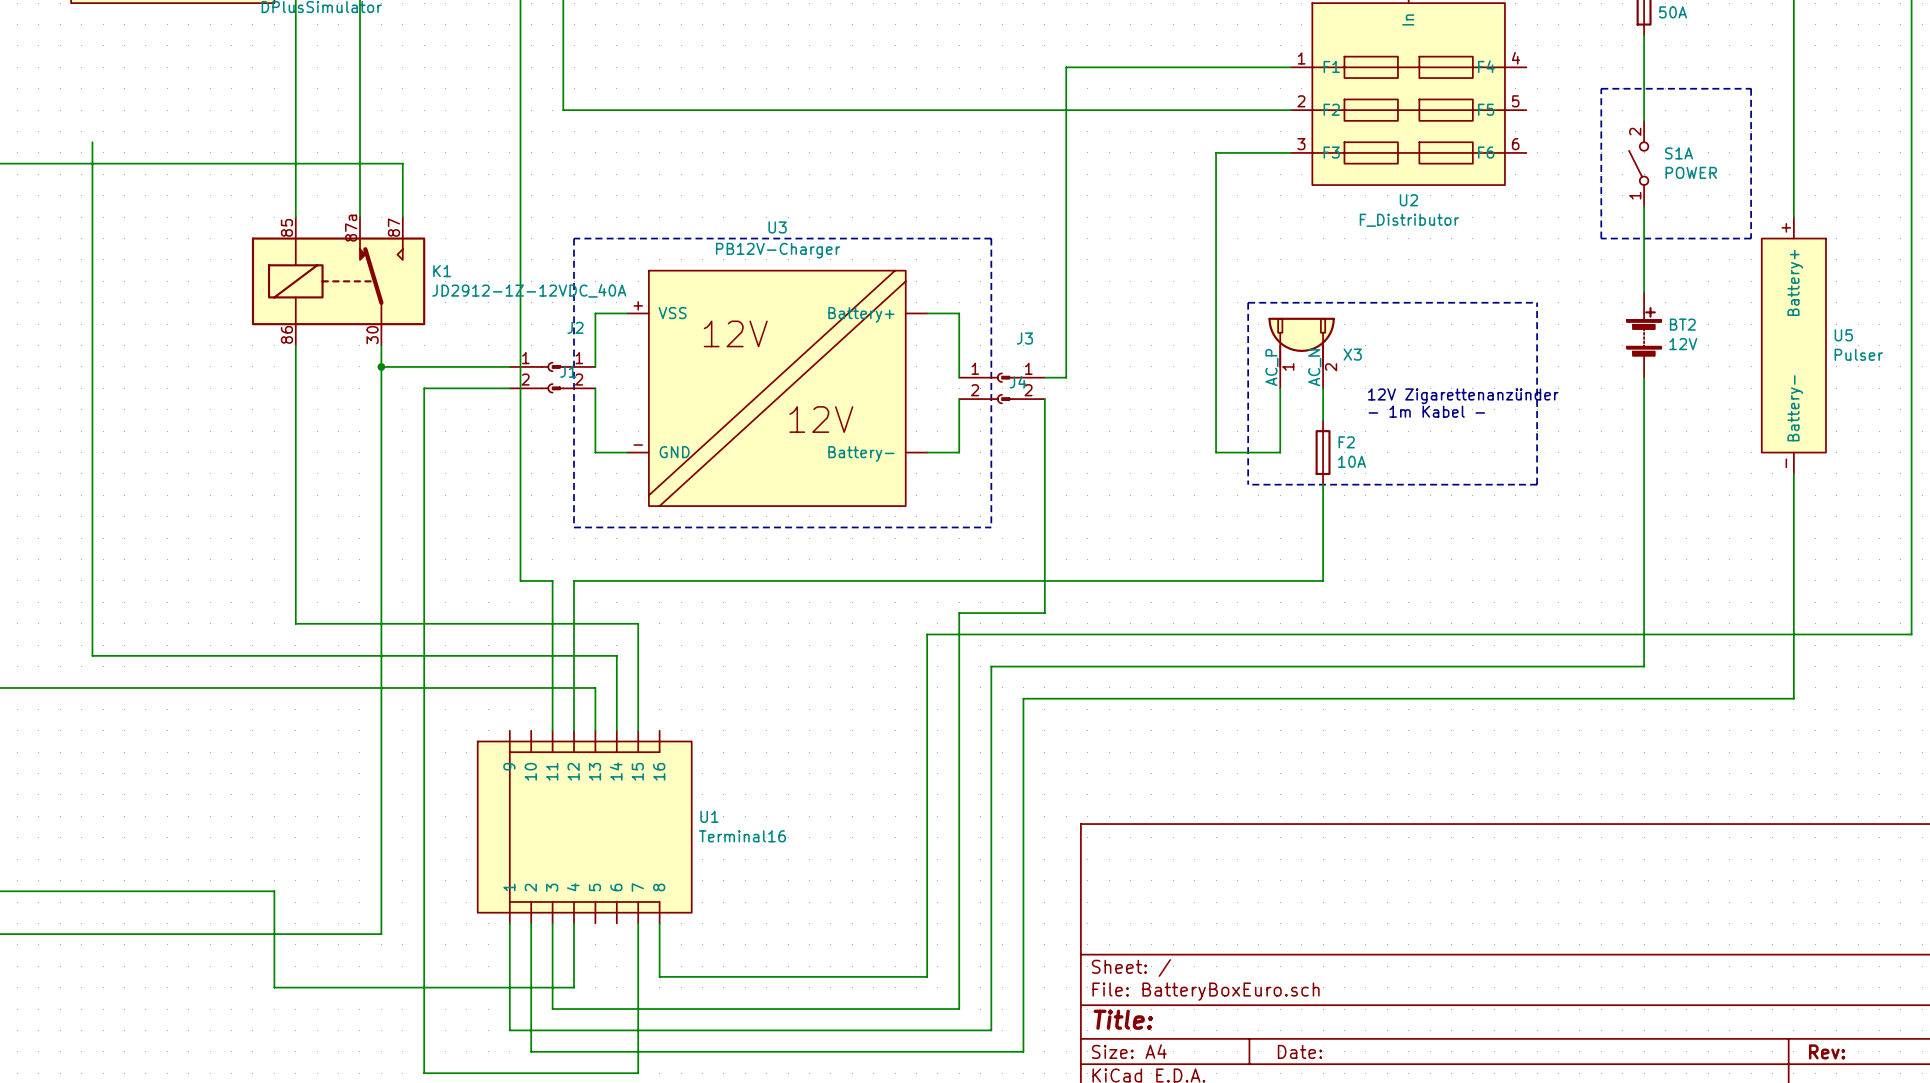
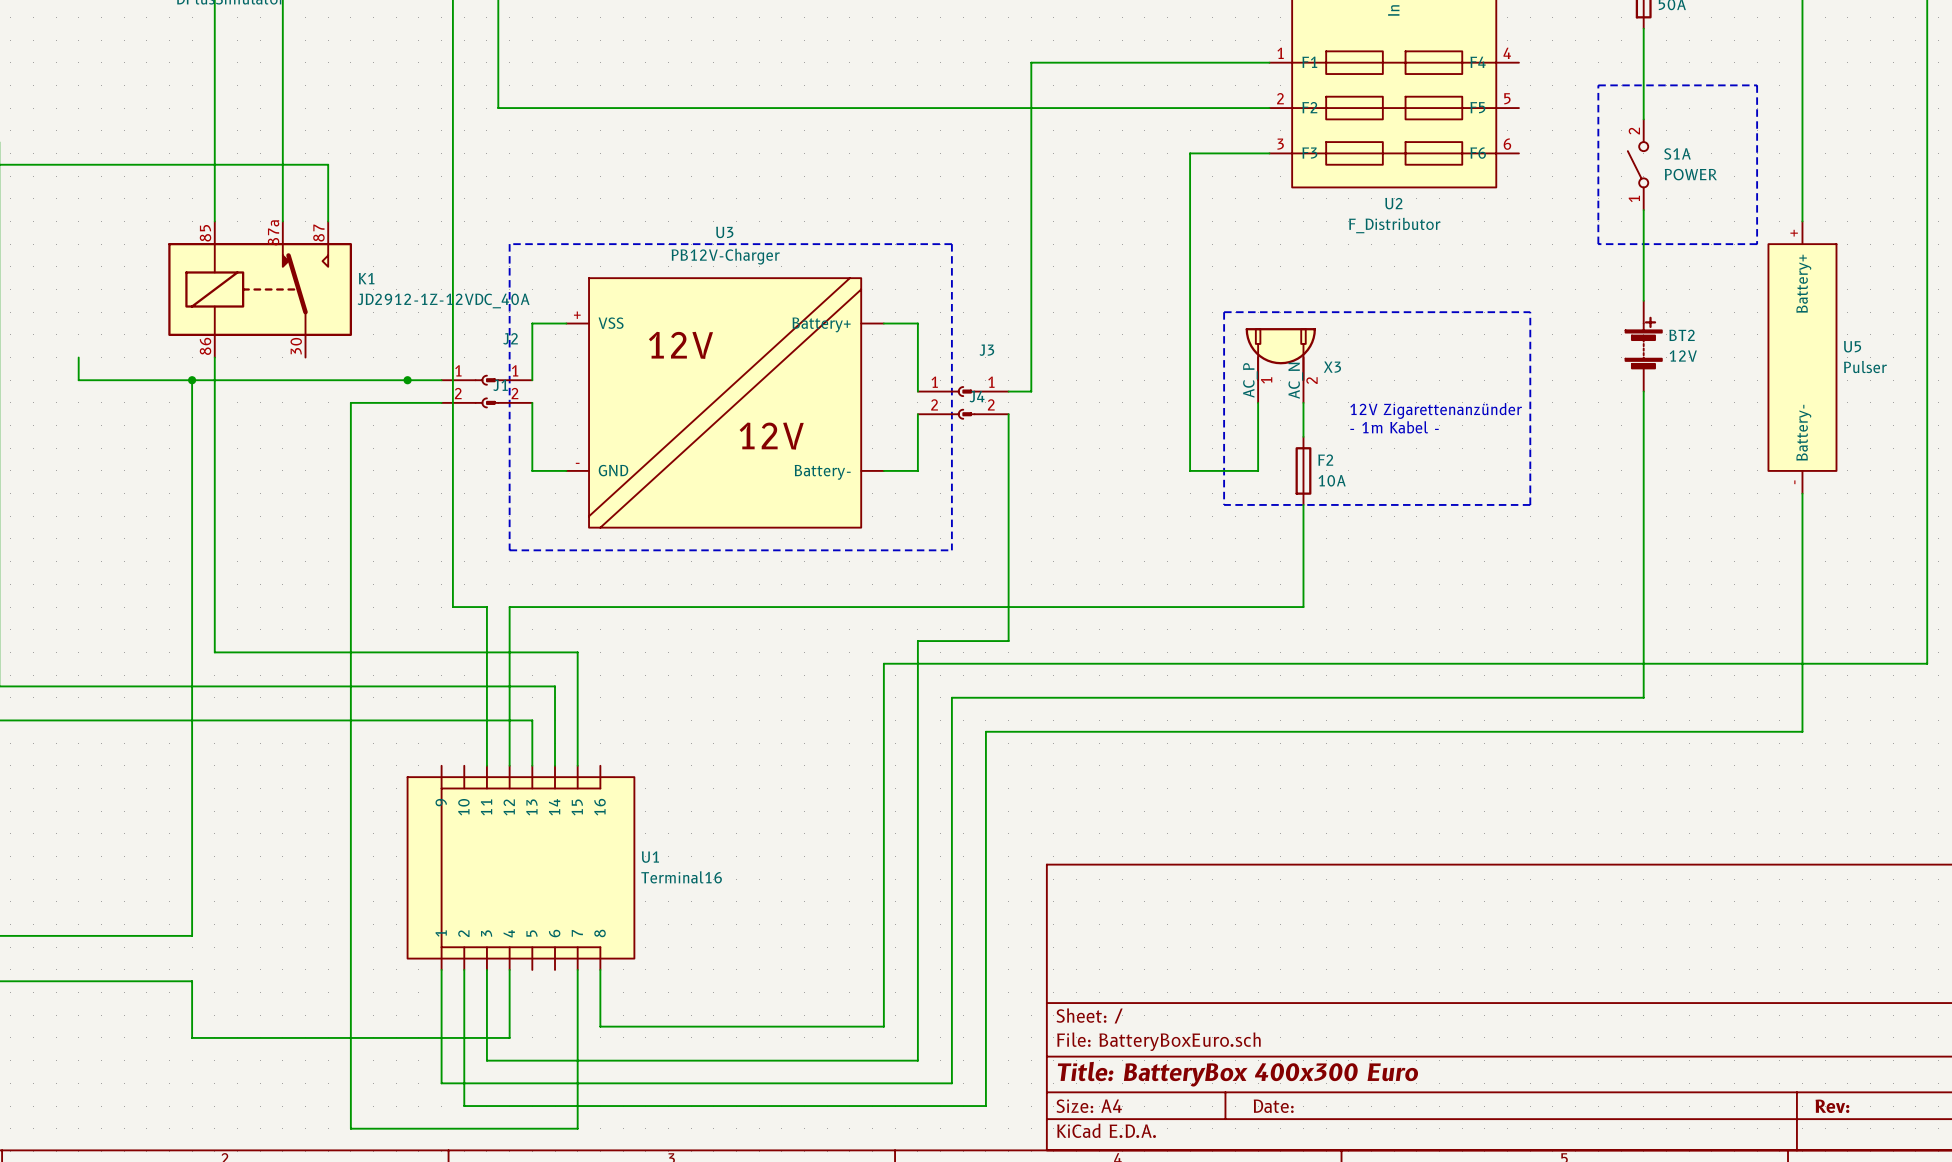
wire: none -> (78, 357) (78, 380) (305, 380)
wire: (381, 345) (381, 934) (274, 934) (274, 891) -> (192, 380) (192, 935)
junction: none -> (192, 380)
junction: (381, 366) -> none
junction: none -> (407, 380)
title block: Title: (1123, 1019) -> Title: BatteryBox 400x300 Euro (1237, 1074)

